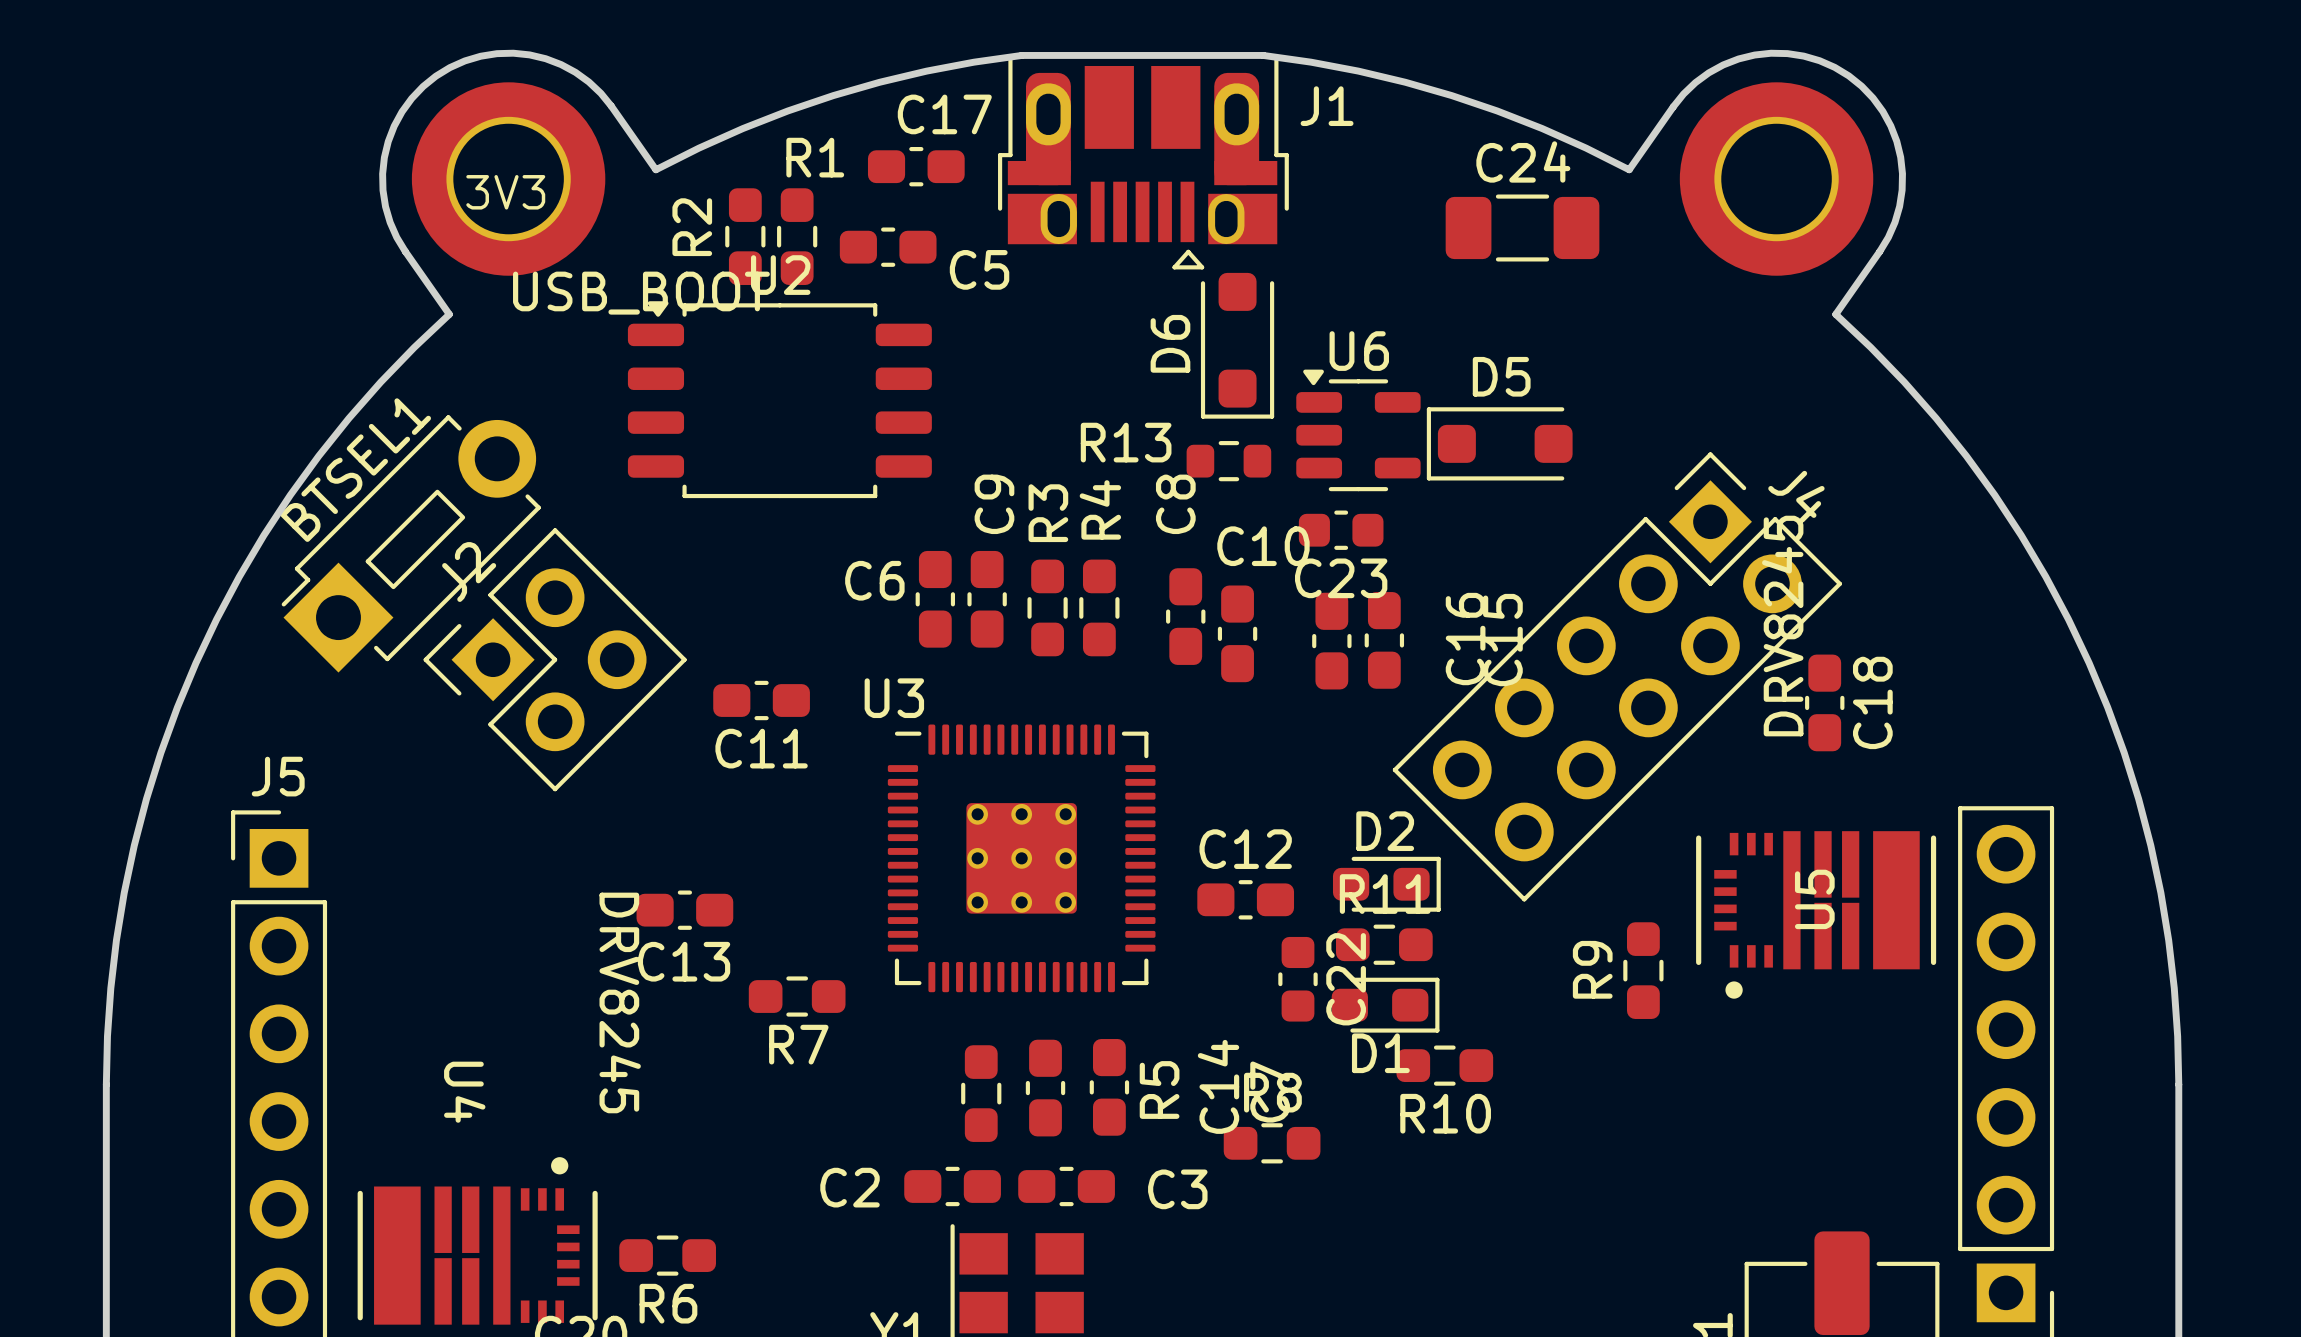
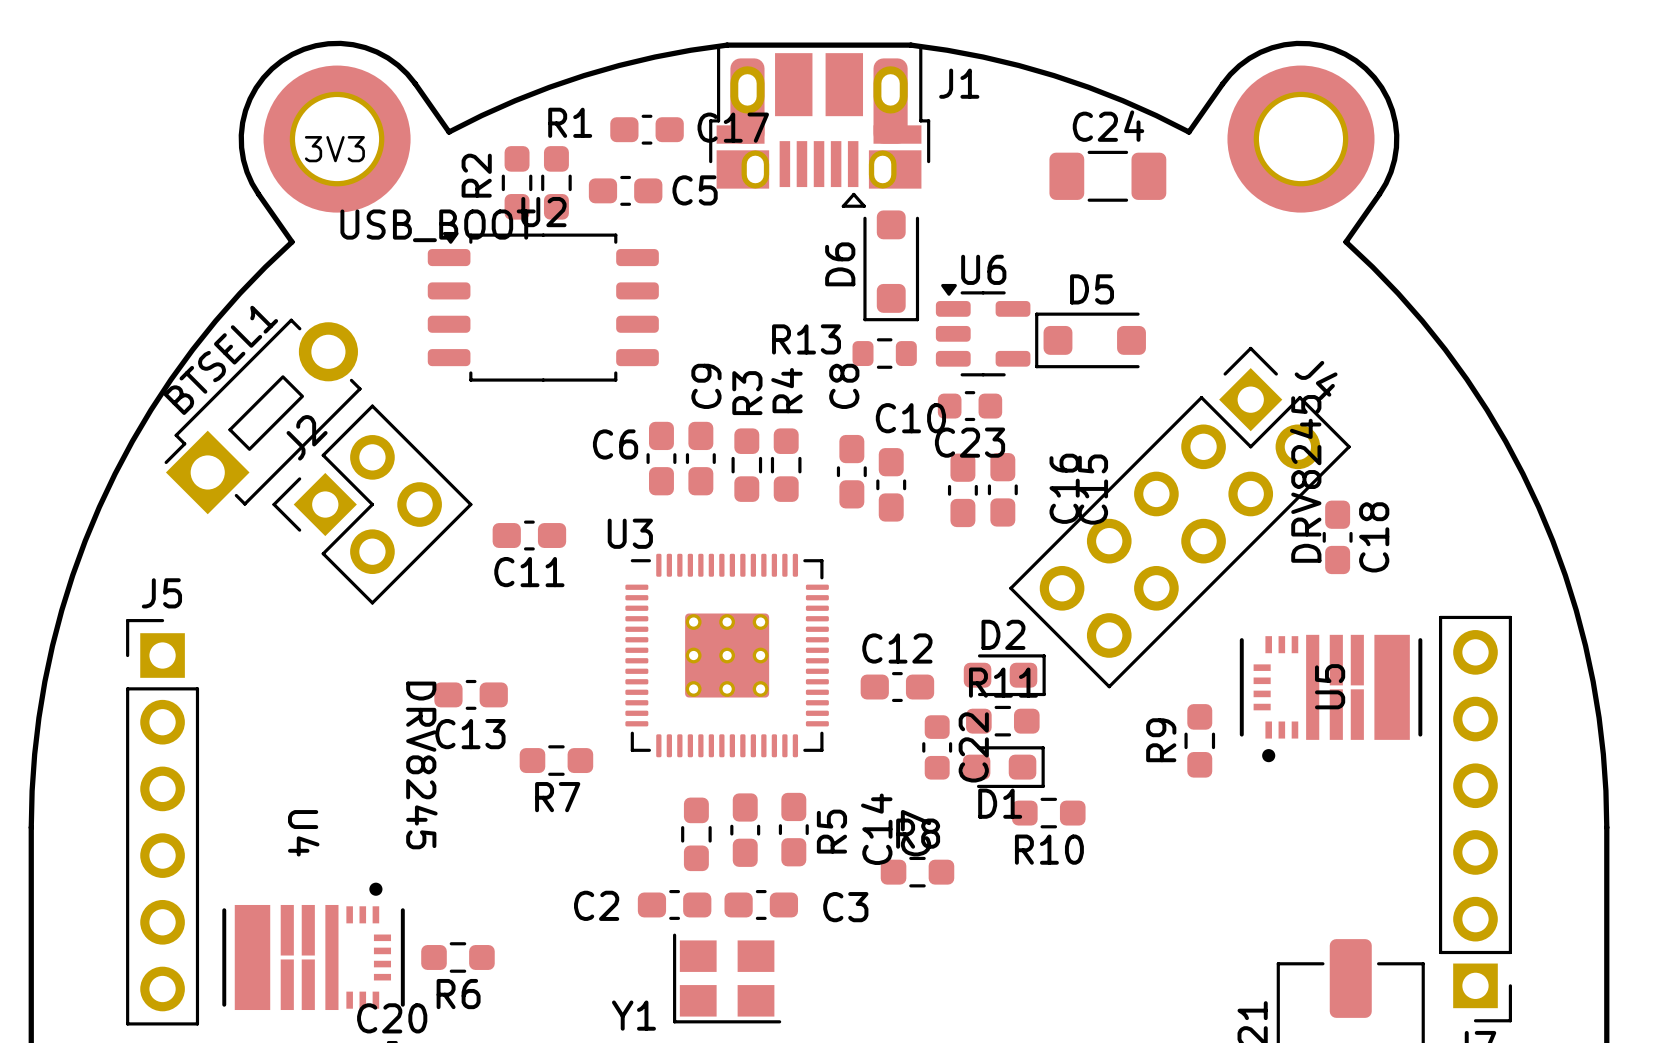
C17 name position: C17 (944, 114) -> C17 (733, 127)
C5 name position: C5 (979, 269) -> C5 (695, 190)

